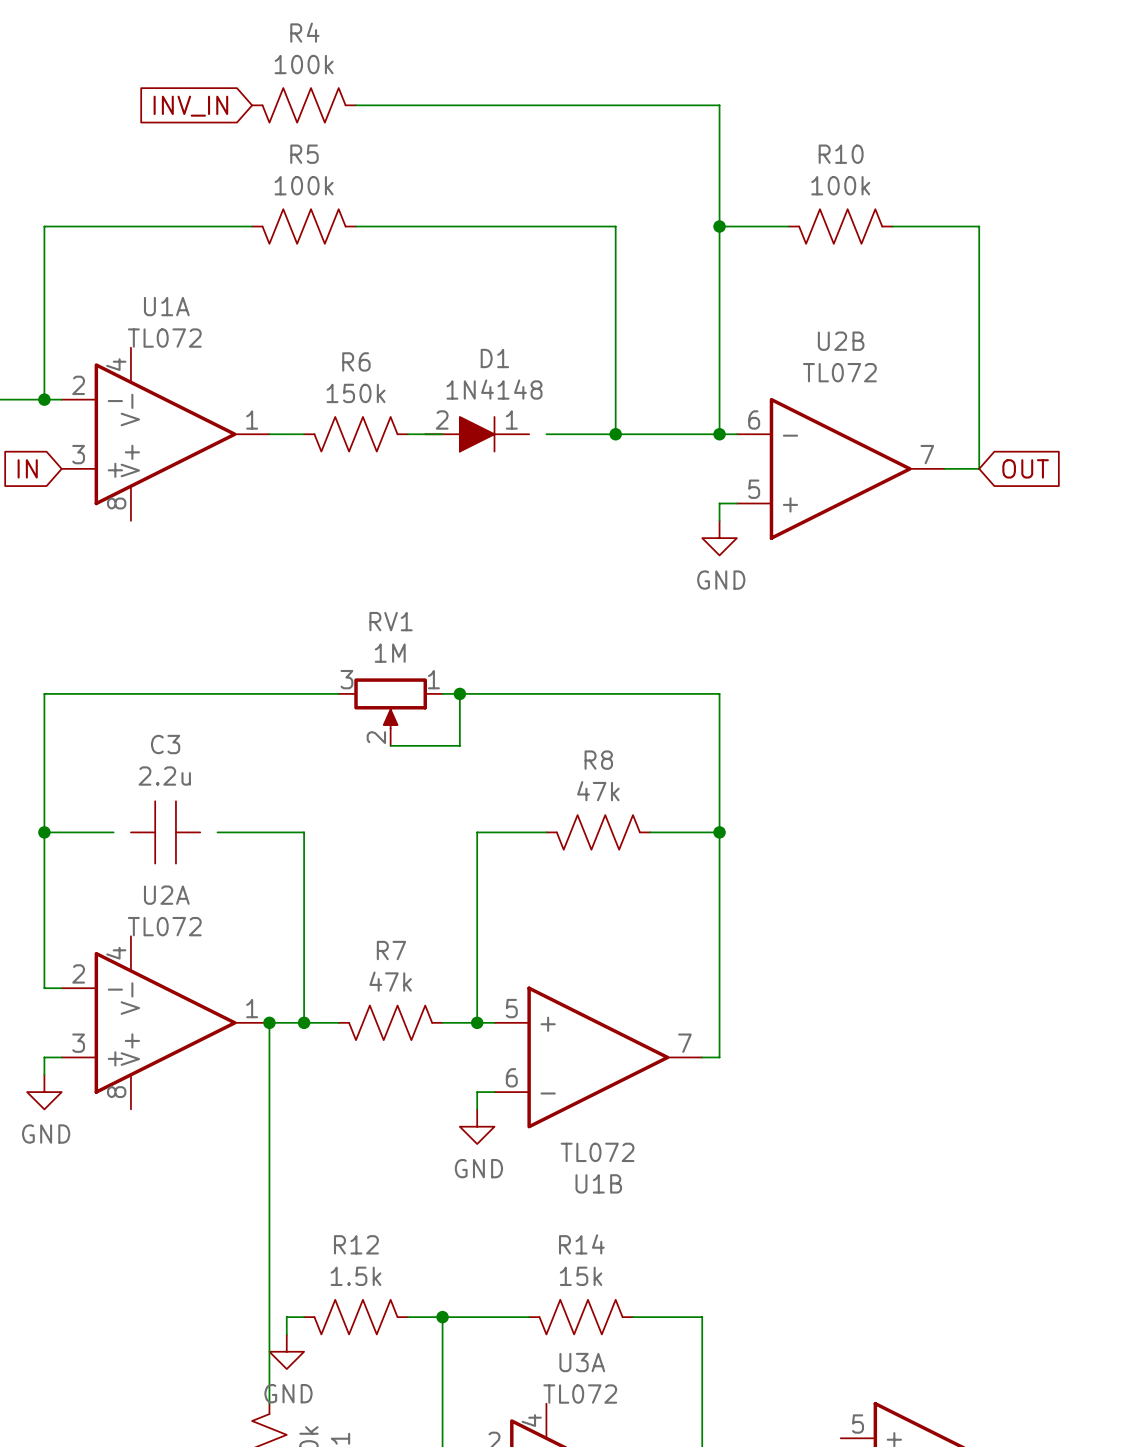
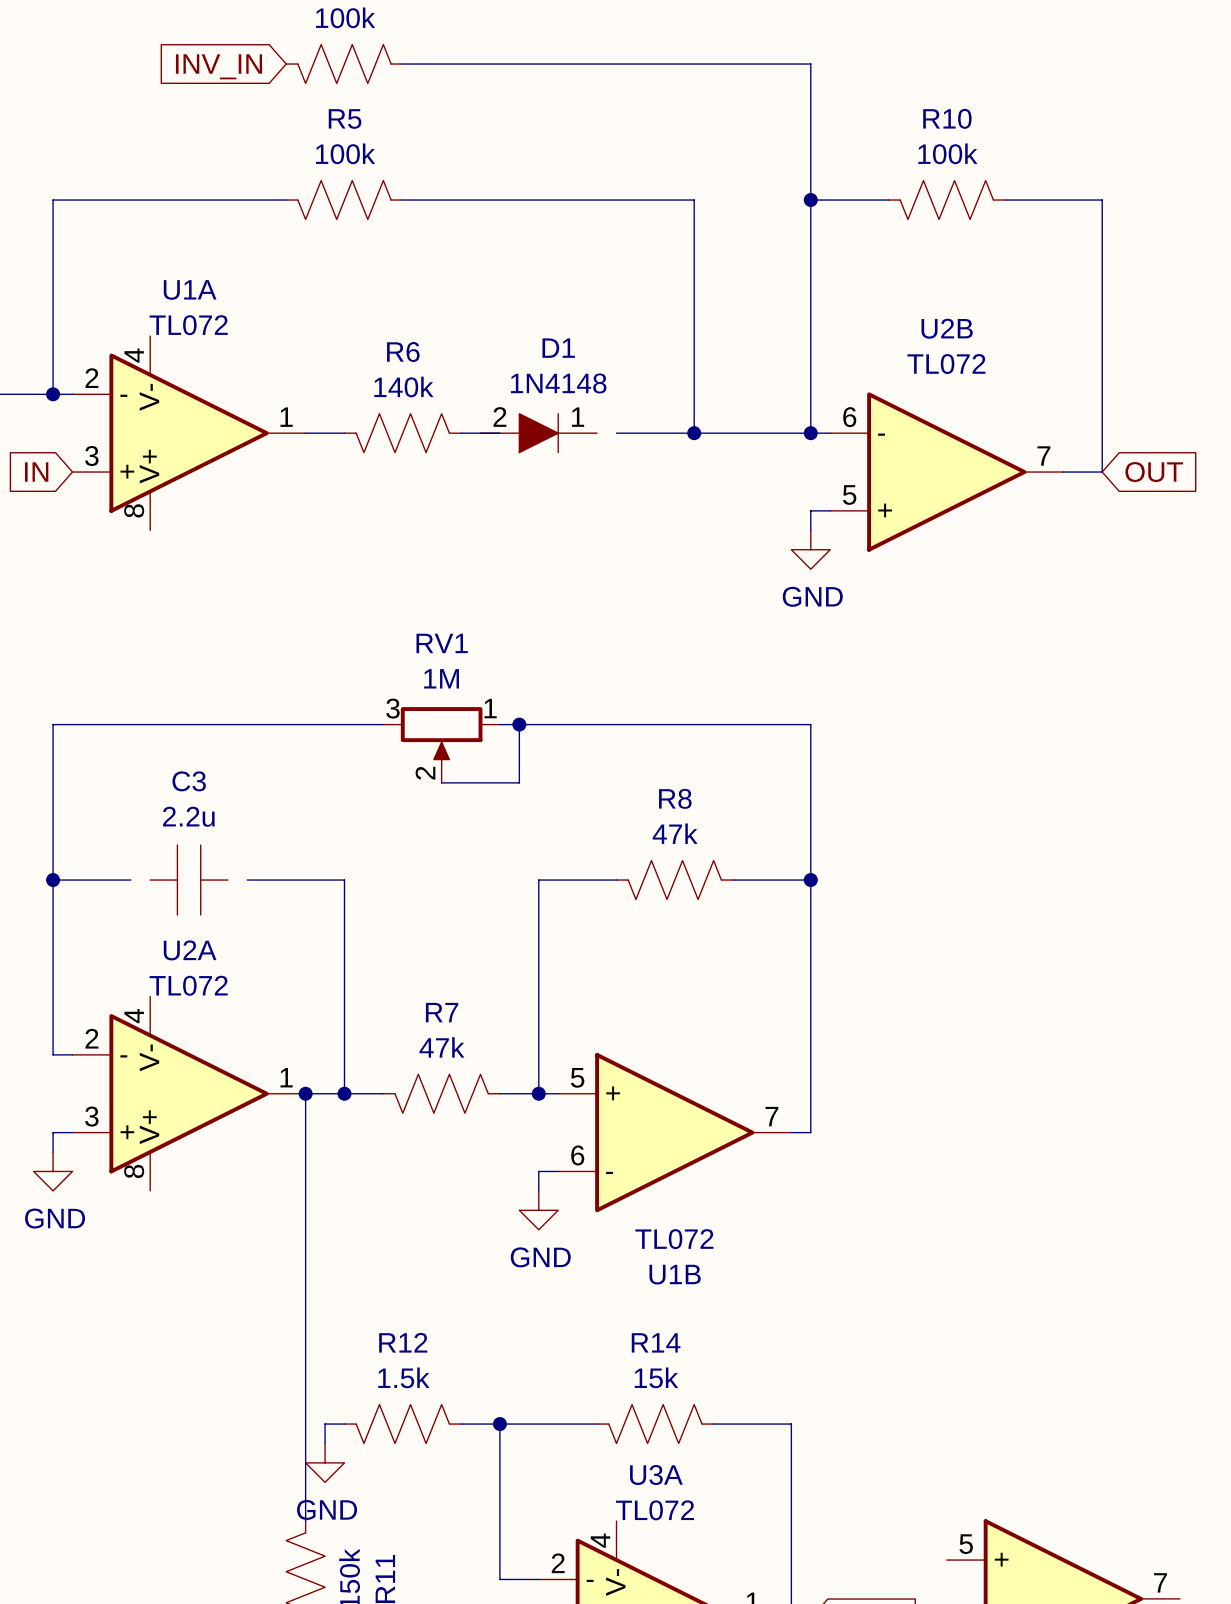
R6 value: 150k (356, 393) -> 140k (403, 386)

